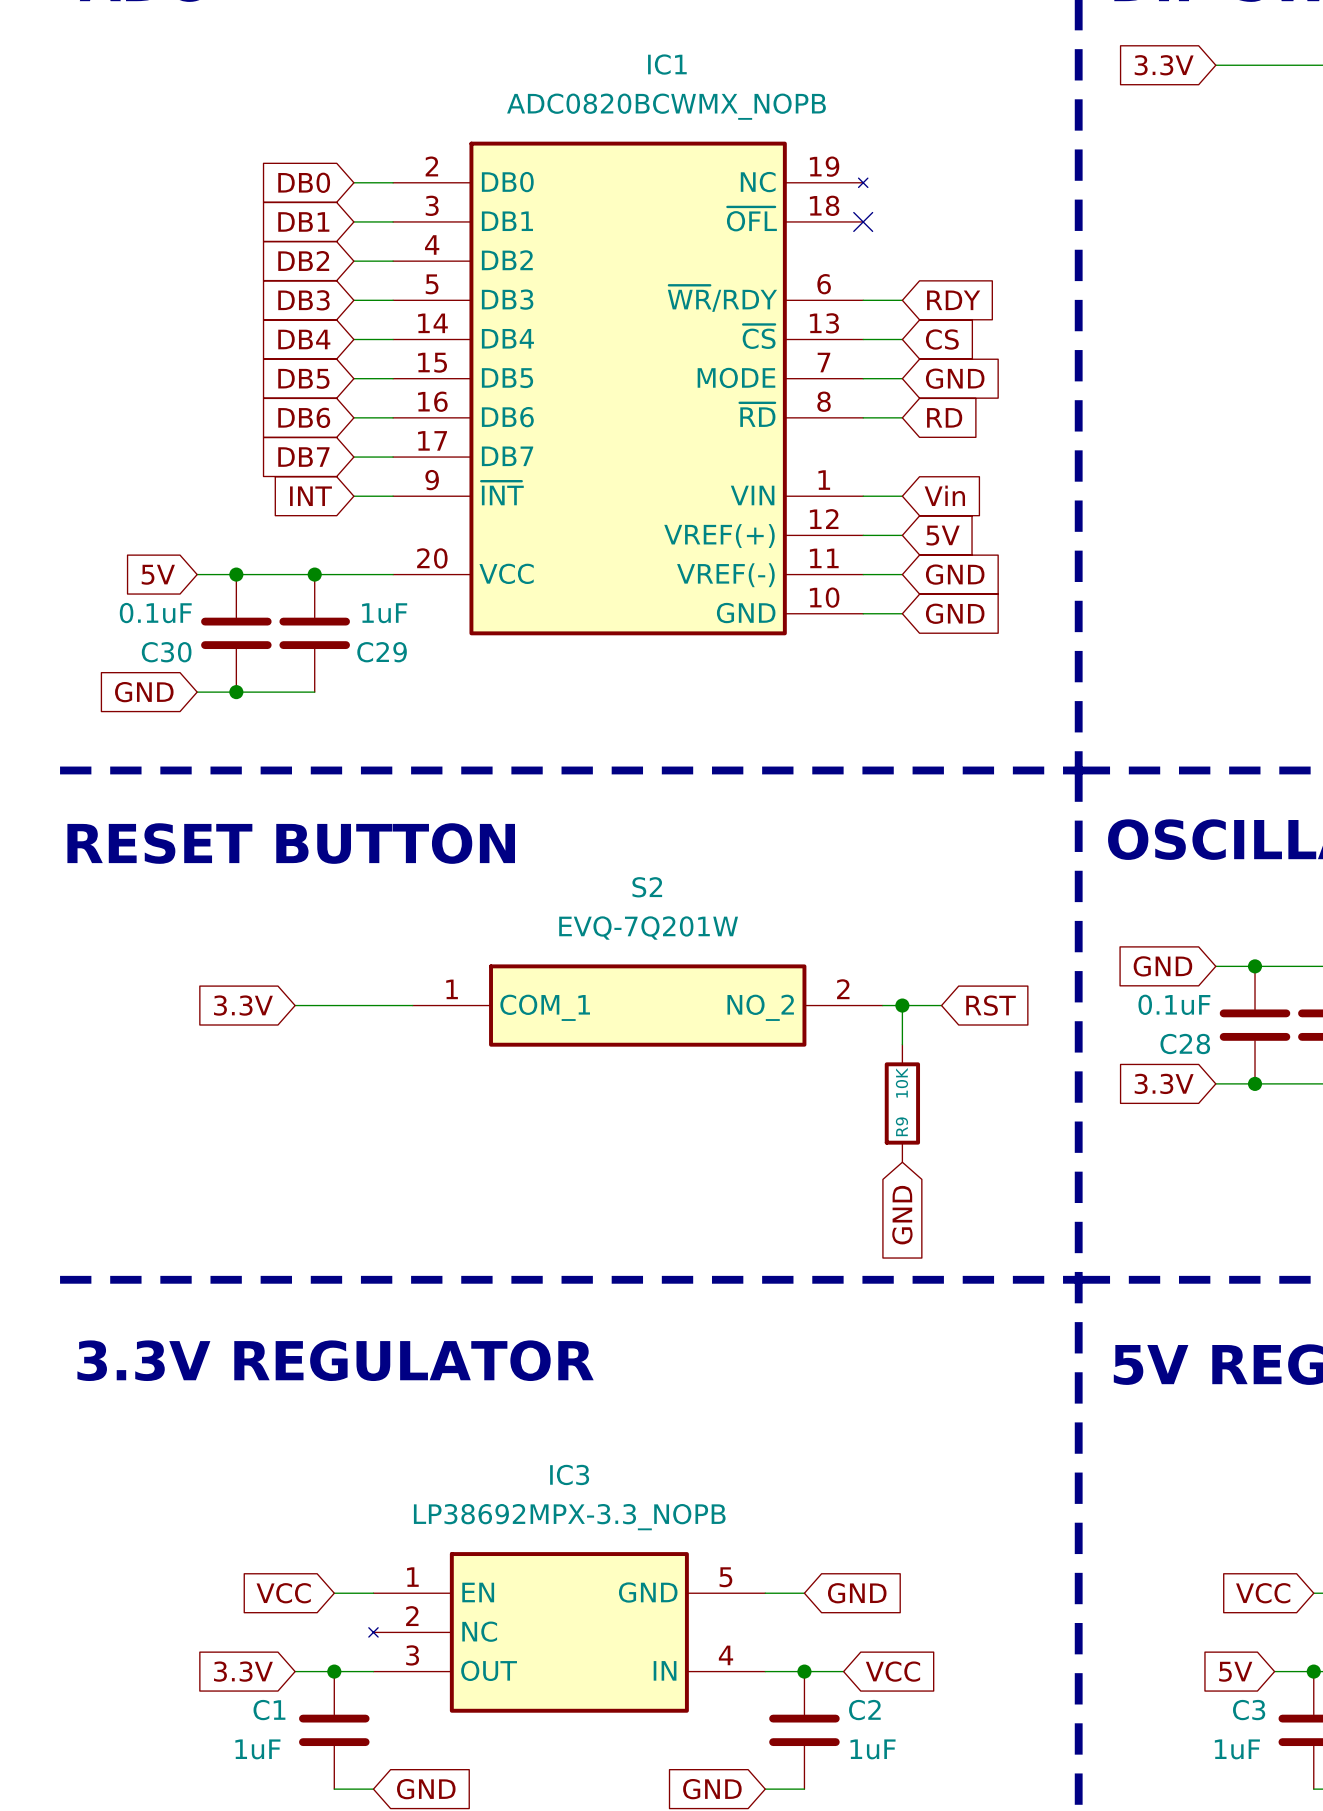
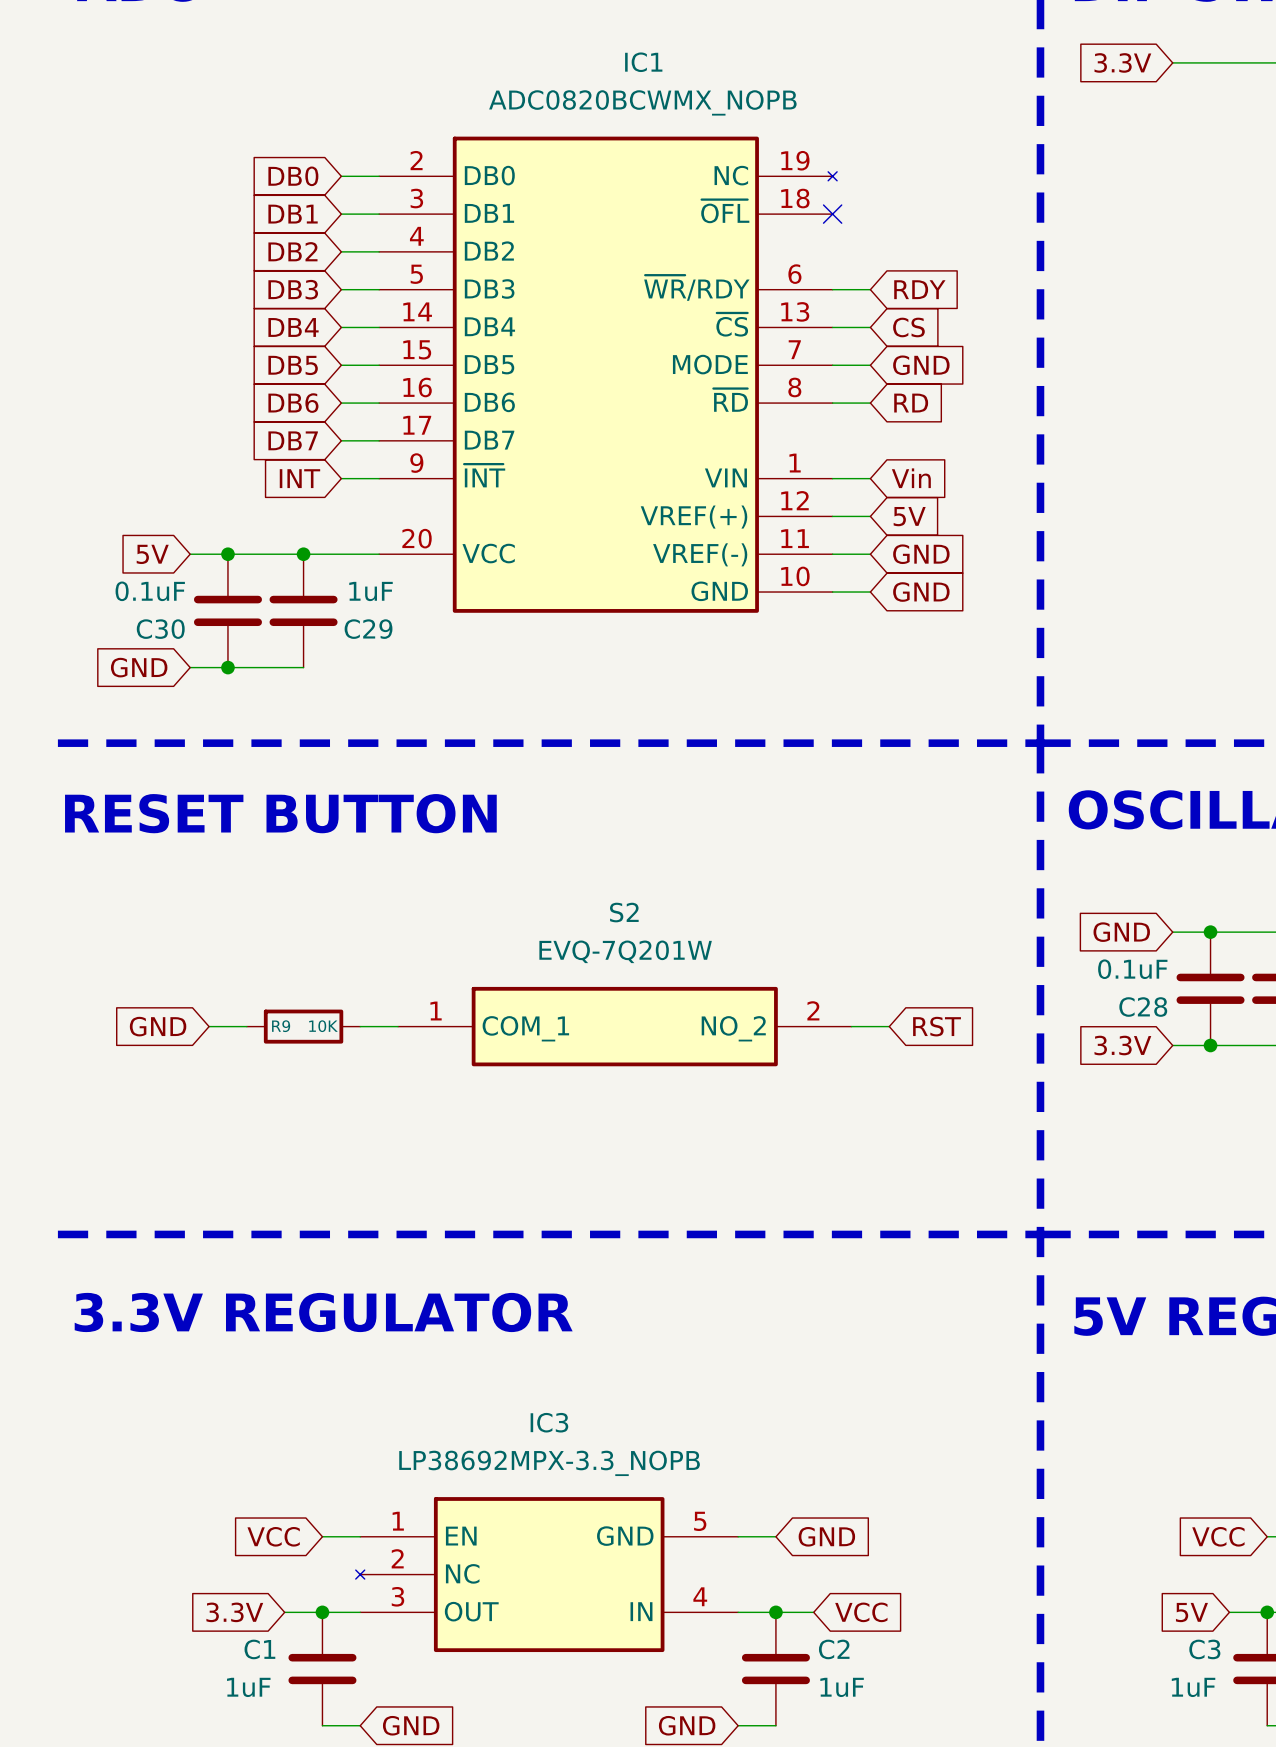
global label: 3.3V (243, 1005) -> none
wire: (295, 1005) (412, 1005) -> none
S2 position: (647, 1005) -> (624, 1026)
wire: (882, 1005) (941, 1005) -> none
wire: (902, 1005) (902, 1044) -> none
junction: (902, 1005) -> none
global label position: RST (991, 1005) -> RST (937, 1026)
global label: none -> GND (158, 1026)
wire: none -> (209, 1026) (246, 1026)
wire: none -> (360, 1026) (398, 1026)
R9 rotation: 0° (902, 1103) -> 90° clockwise (303, 1026)
R9 position: (902, 1103) -> (303, 1026)
global label: GND (902, 1215) -> none

